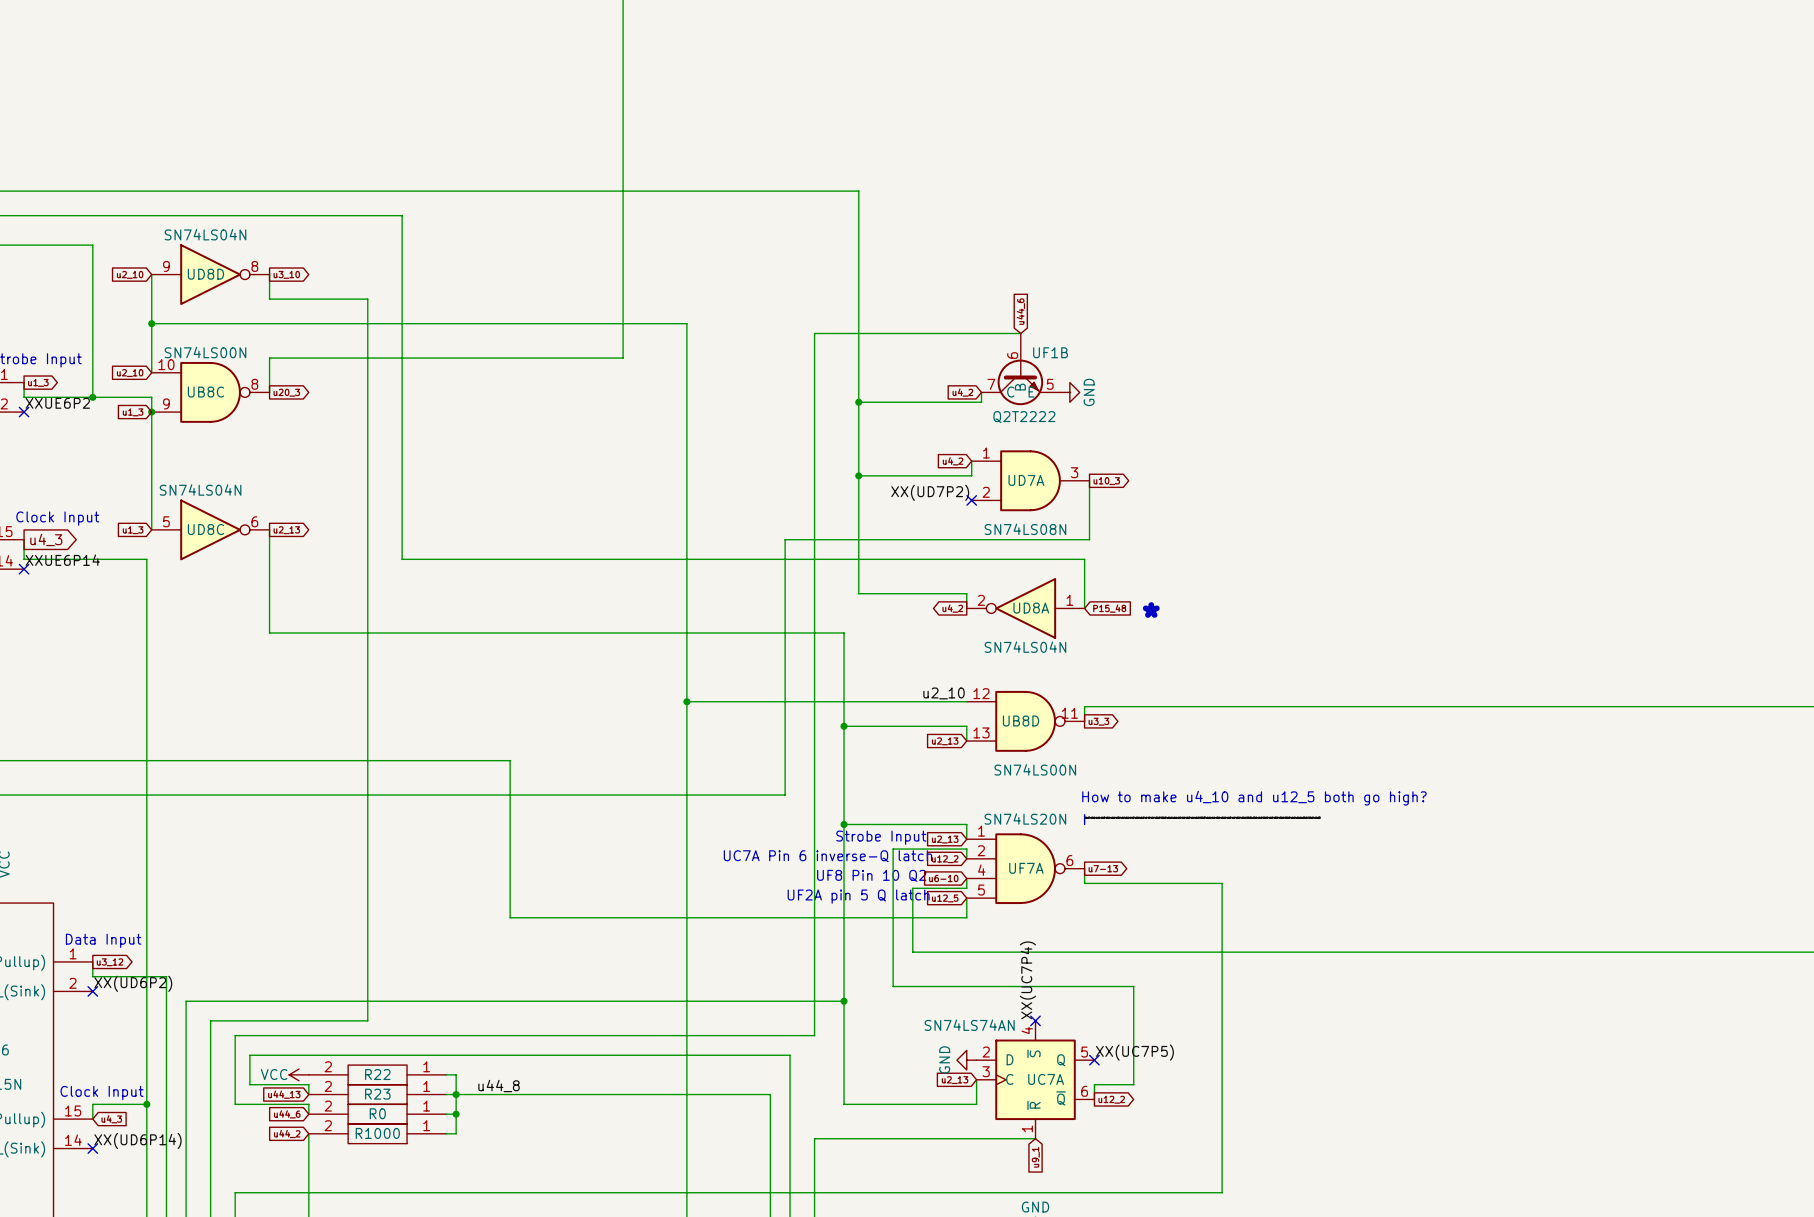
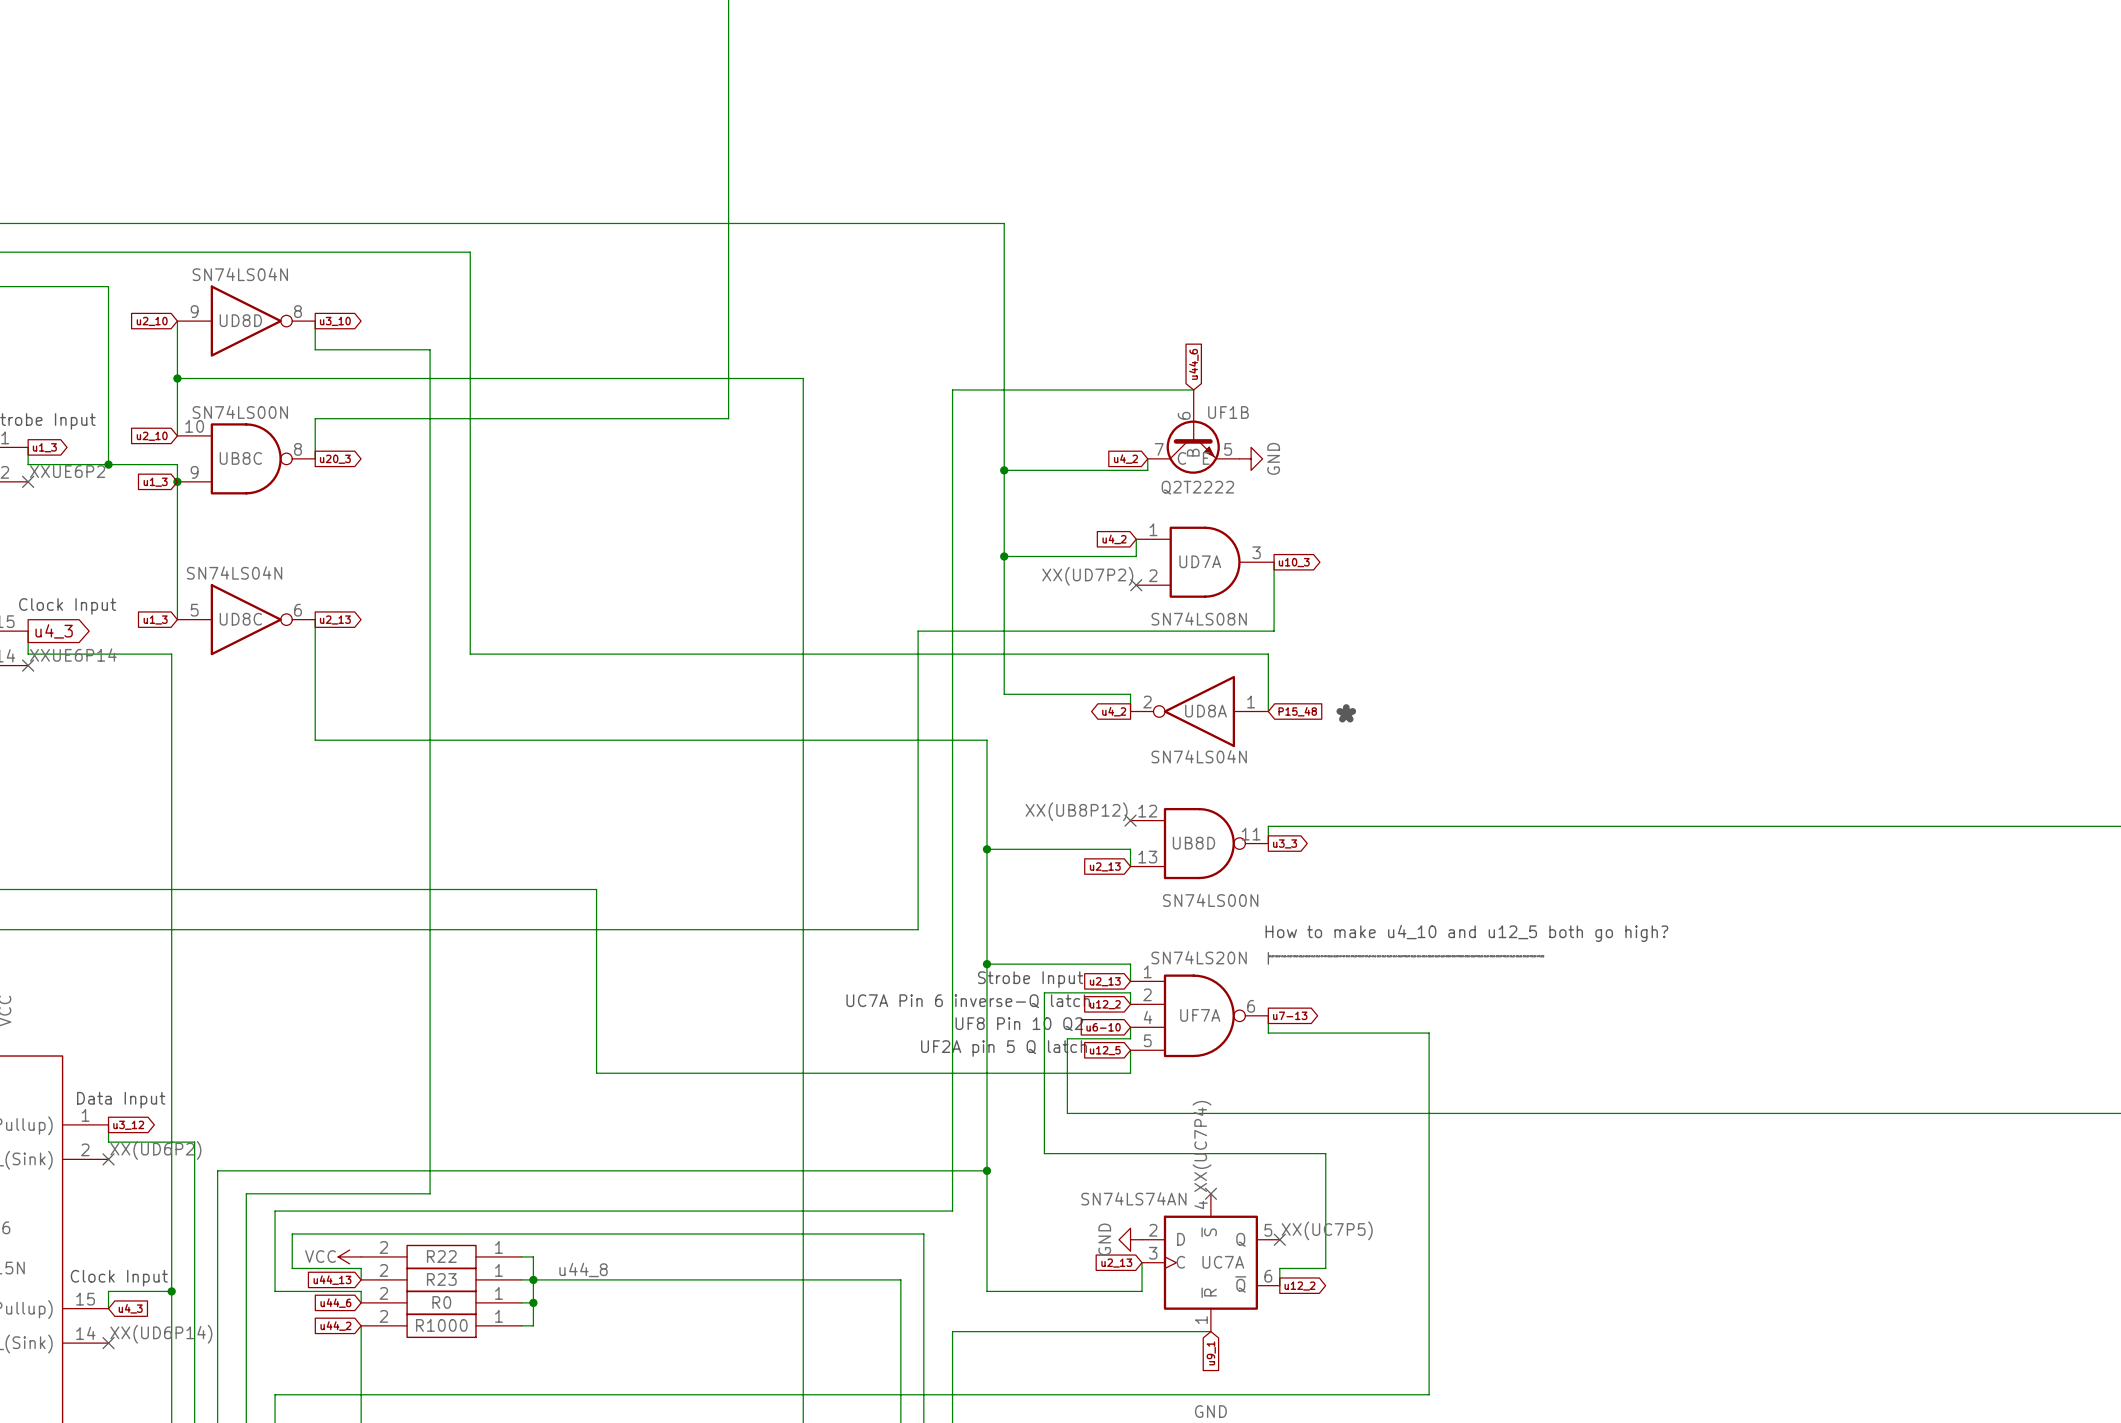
label: u2_10 (944, 693) -> XX(UB8P12) (1076, 811)
wire: (686, 701) (966, 701) -> none
junction: (686, 701) -> none
no-connect mark: none -> (1130, 820)

